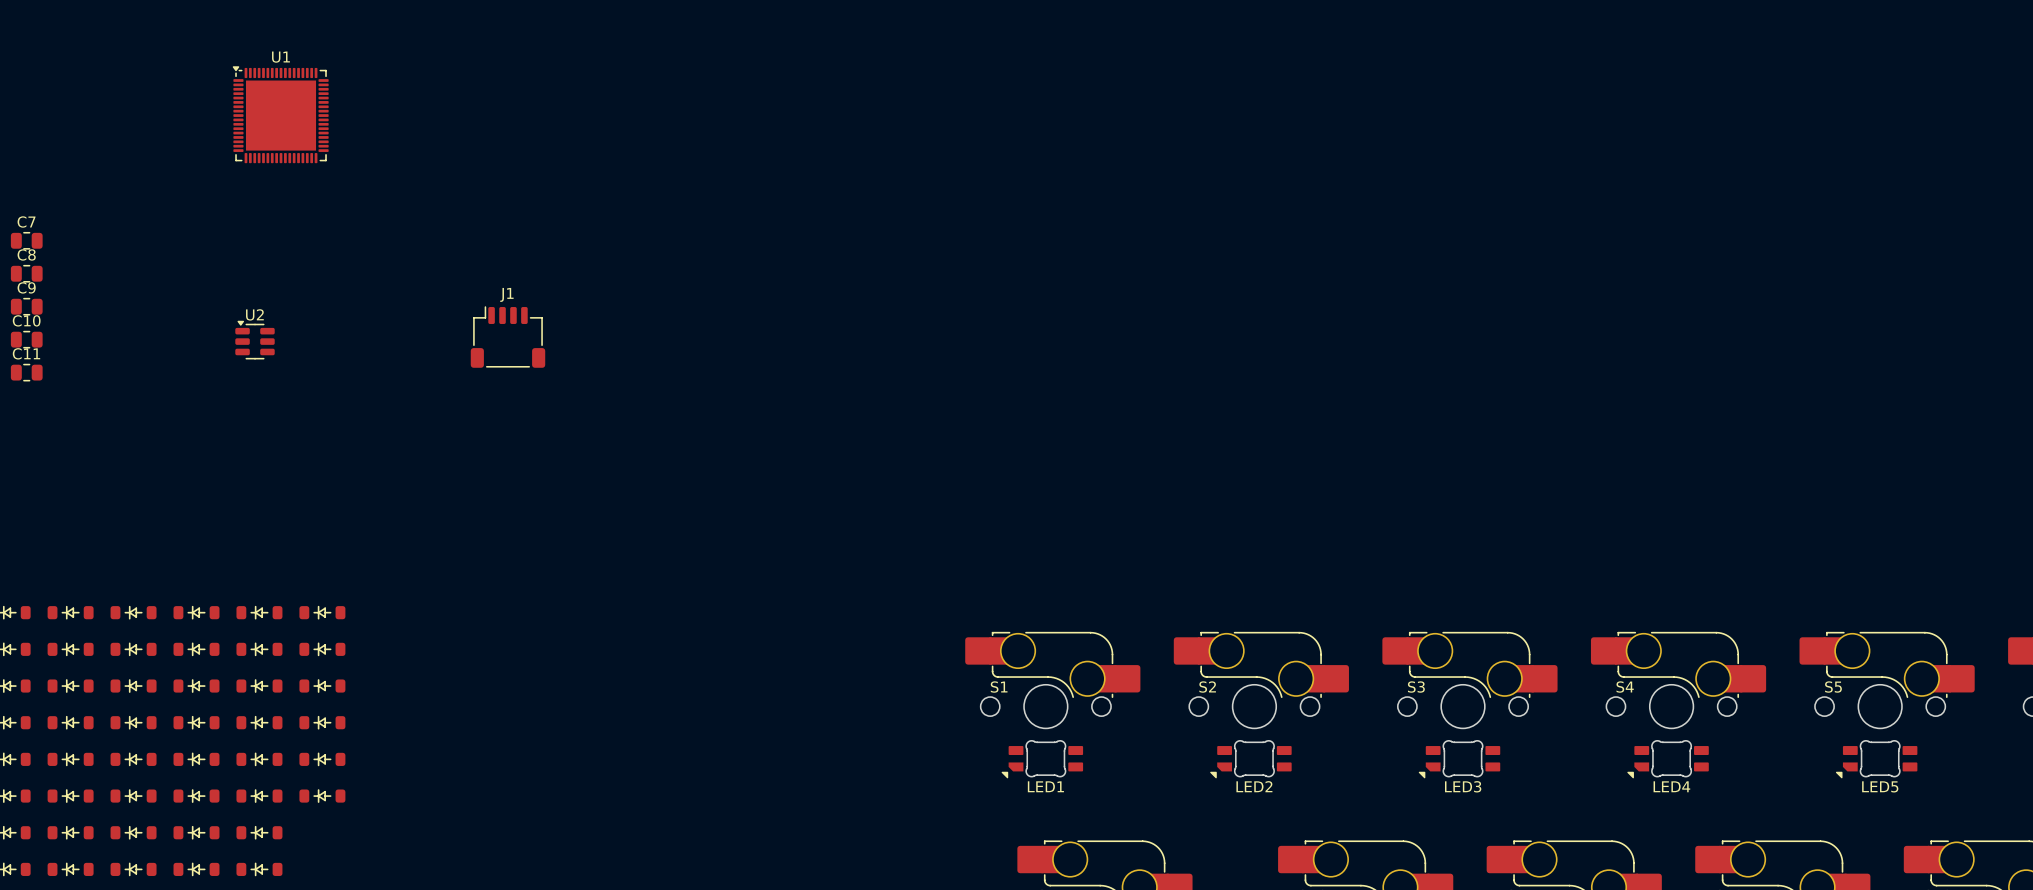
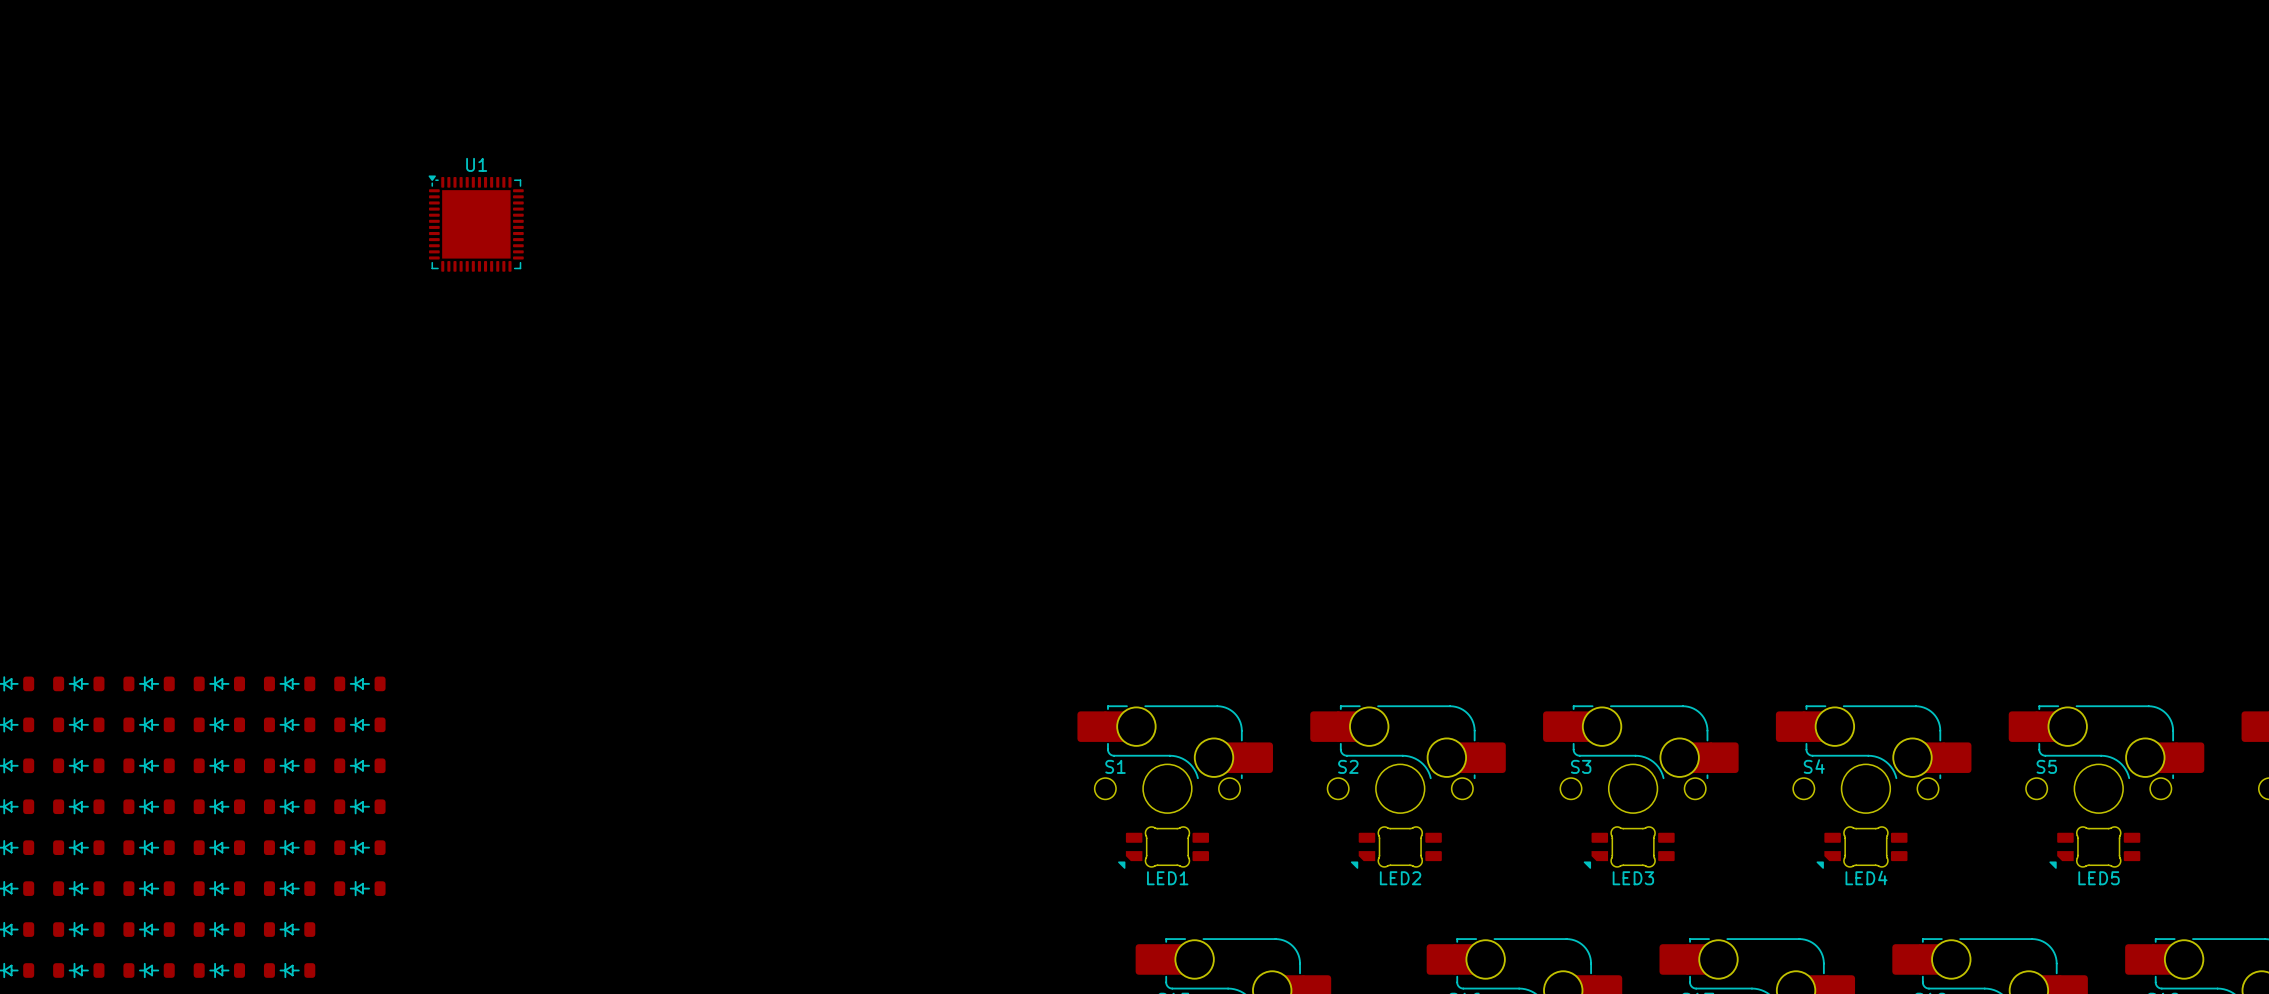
U1 footprint: [232, 66, 329, 164] -> [428, 175, 524, 272]
C7: (26, 240) -> none
C8: (26, 273) -> none
C9: (26, 306) -> none
J1: (507, 337) -> none
C10: (26, 339) -> none
U2: (255, 340) -> none
C11: (26, 372) -> none

